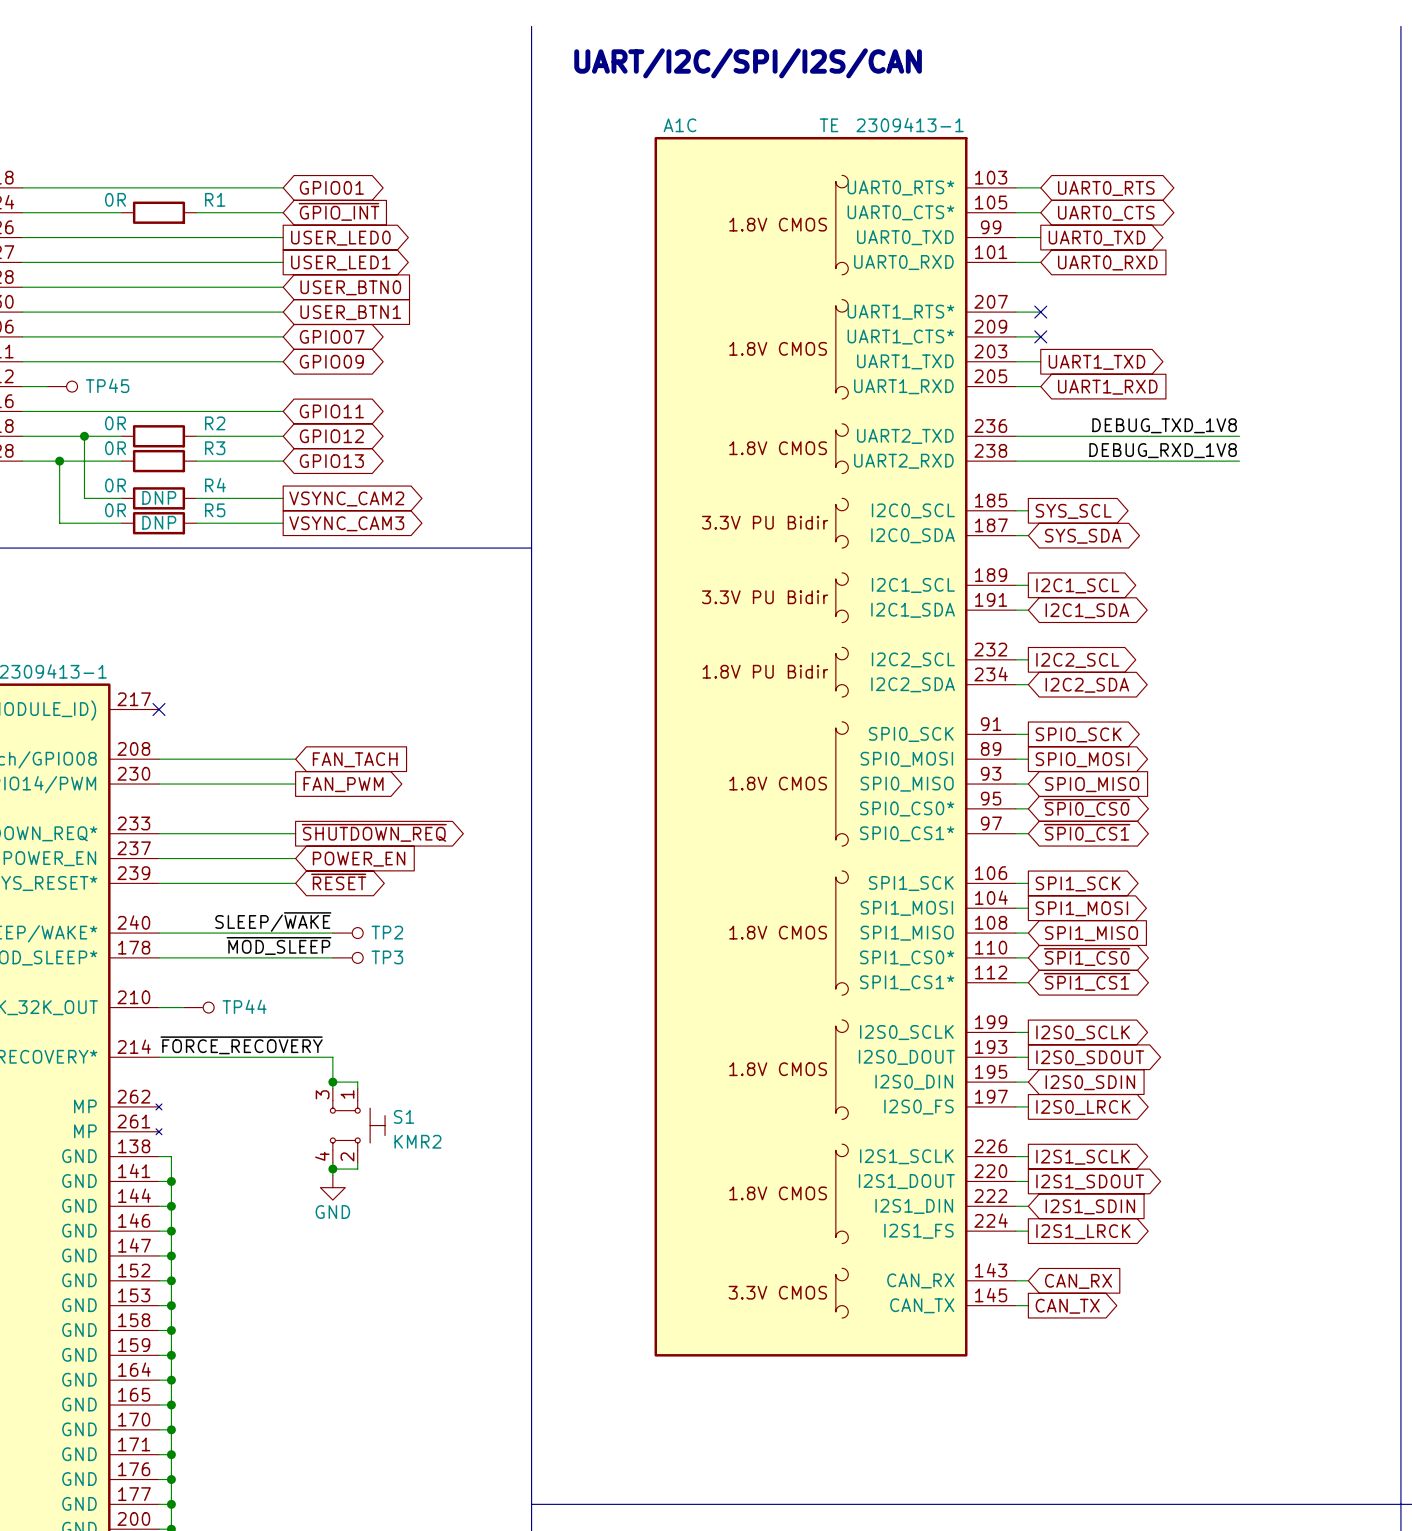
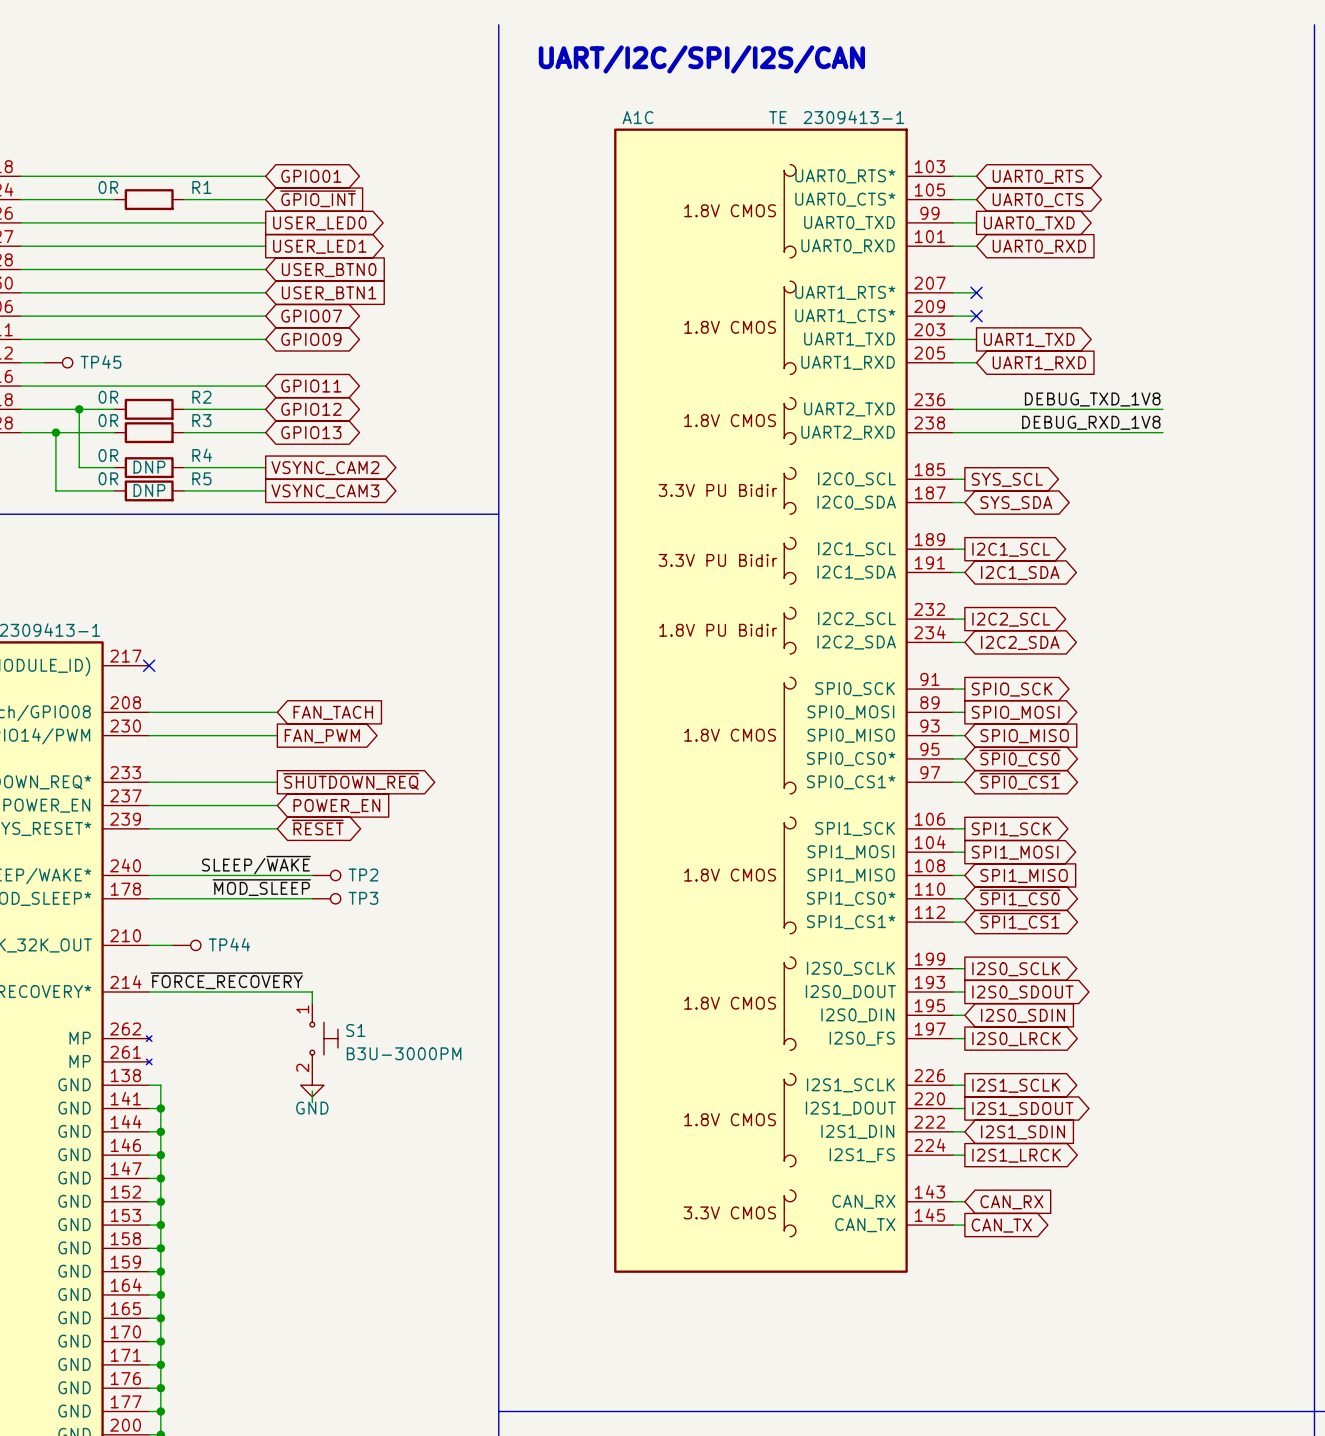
wire: (332, 1082) (357, 1082) (357, 1088) -> none
junction: (332, 1082) -> none
S1 symbol: [330, 1088, 386, 1163] -> [309, 1003, 338, 1074]
S1 value: KMR2 (417, 1141) -> B3U-3000PM (404, 1053)
wire: (357, 1162) (357, 1169) (332, 1169) -> none
junction: (332, 1169) -> none
power symbol position: GND (332, 1187) -> GND (312, 1085)

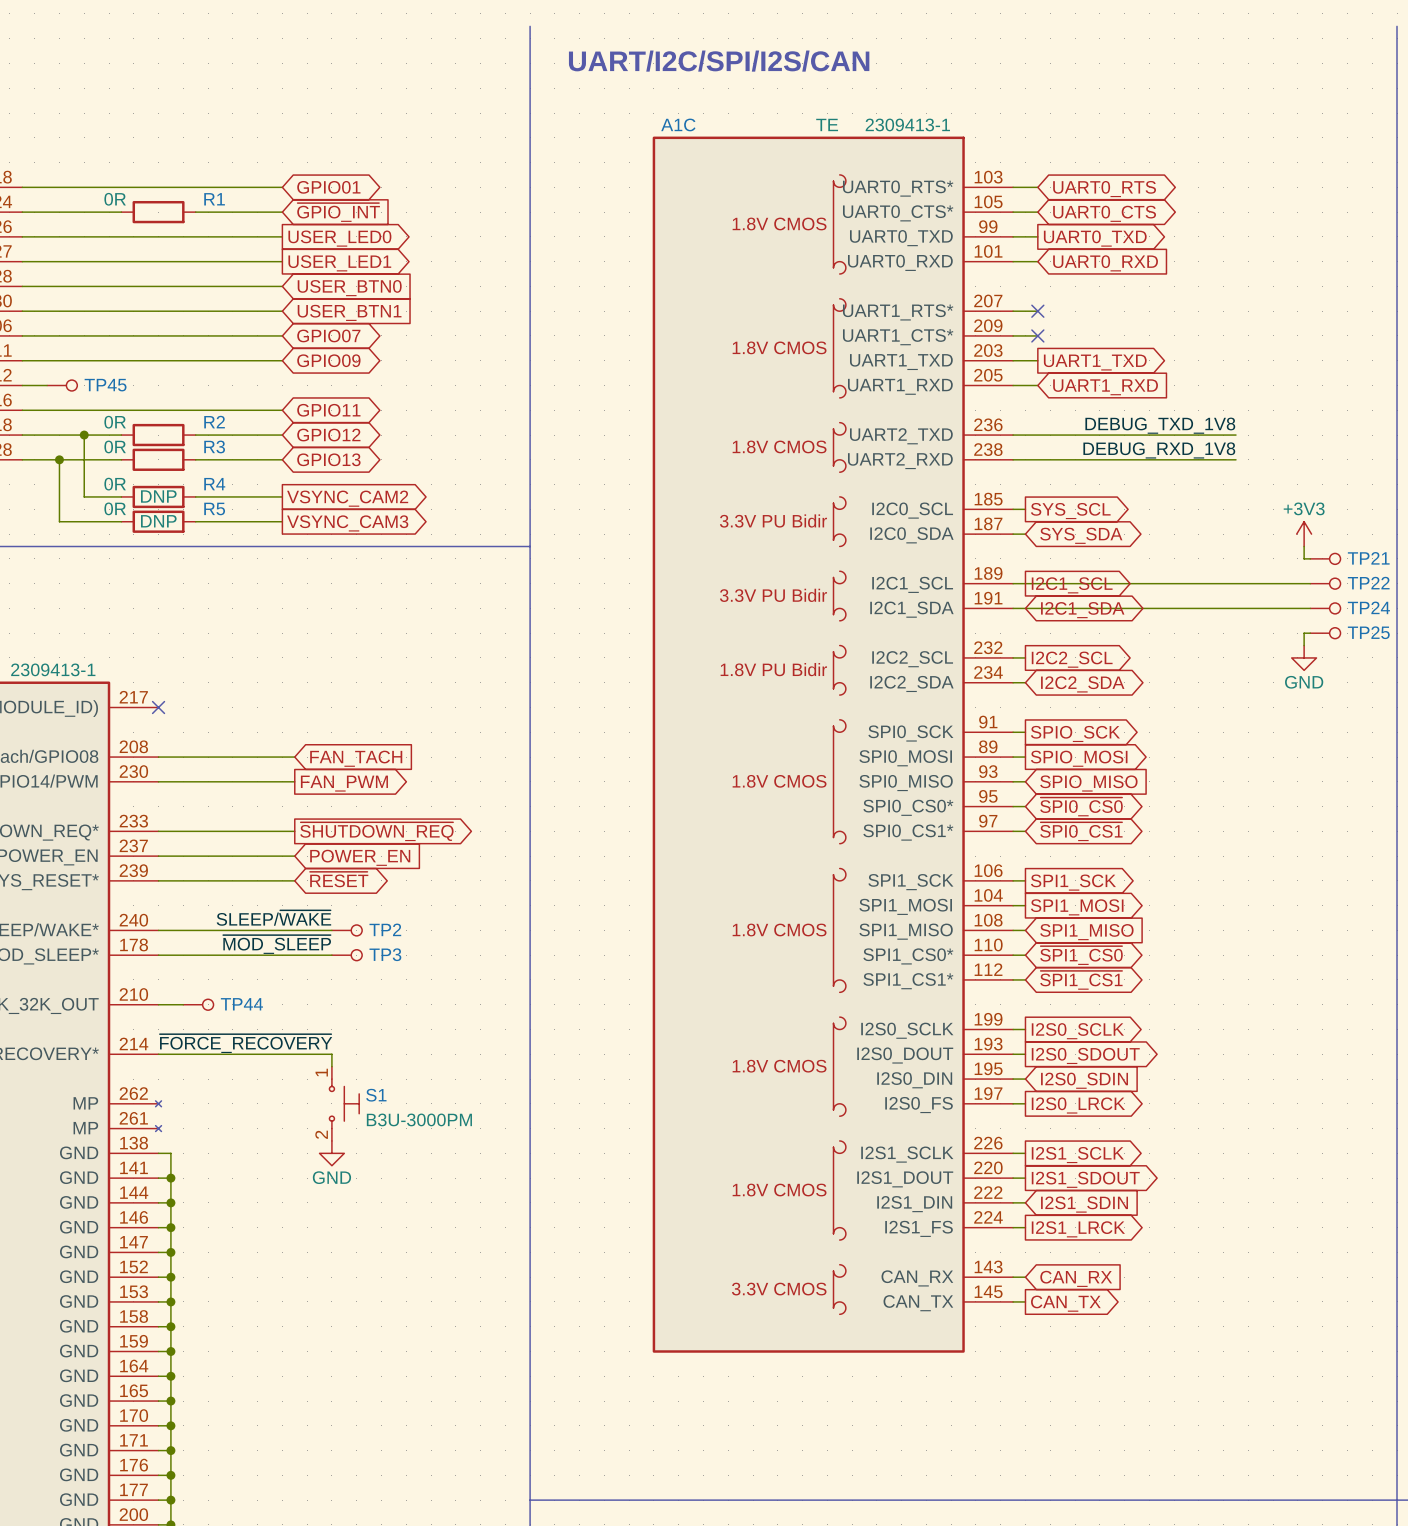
power symbol: none -> +3V3 (1304, 534)
wire: none -> (1304, 546) (1304, 558) (1310, 558)
TP21: none -> (1325, 558)
wire: none -> (1025, 583) (1310, 583)
TP22: none -> (1325, 583)
wire: none -> (1025, 608) (1310, 608)
TP24: none -> (1325, 608)
wire: none -> (1310, 633) (1304, 633) (1304, 645)
TP25: none -> (1325, 633)
power symbol: none -> GND (1304, 657)
wire: (312, 1091) (312, 1102) -> none

